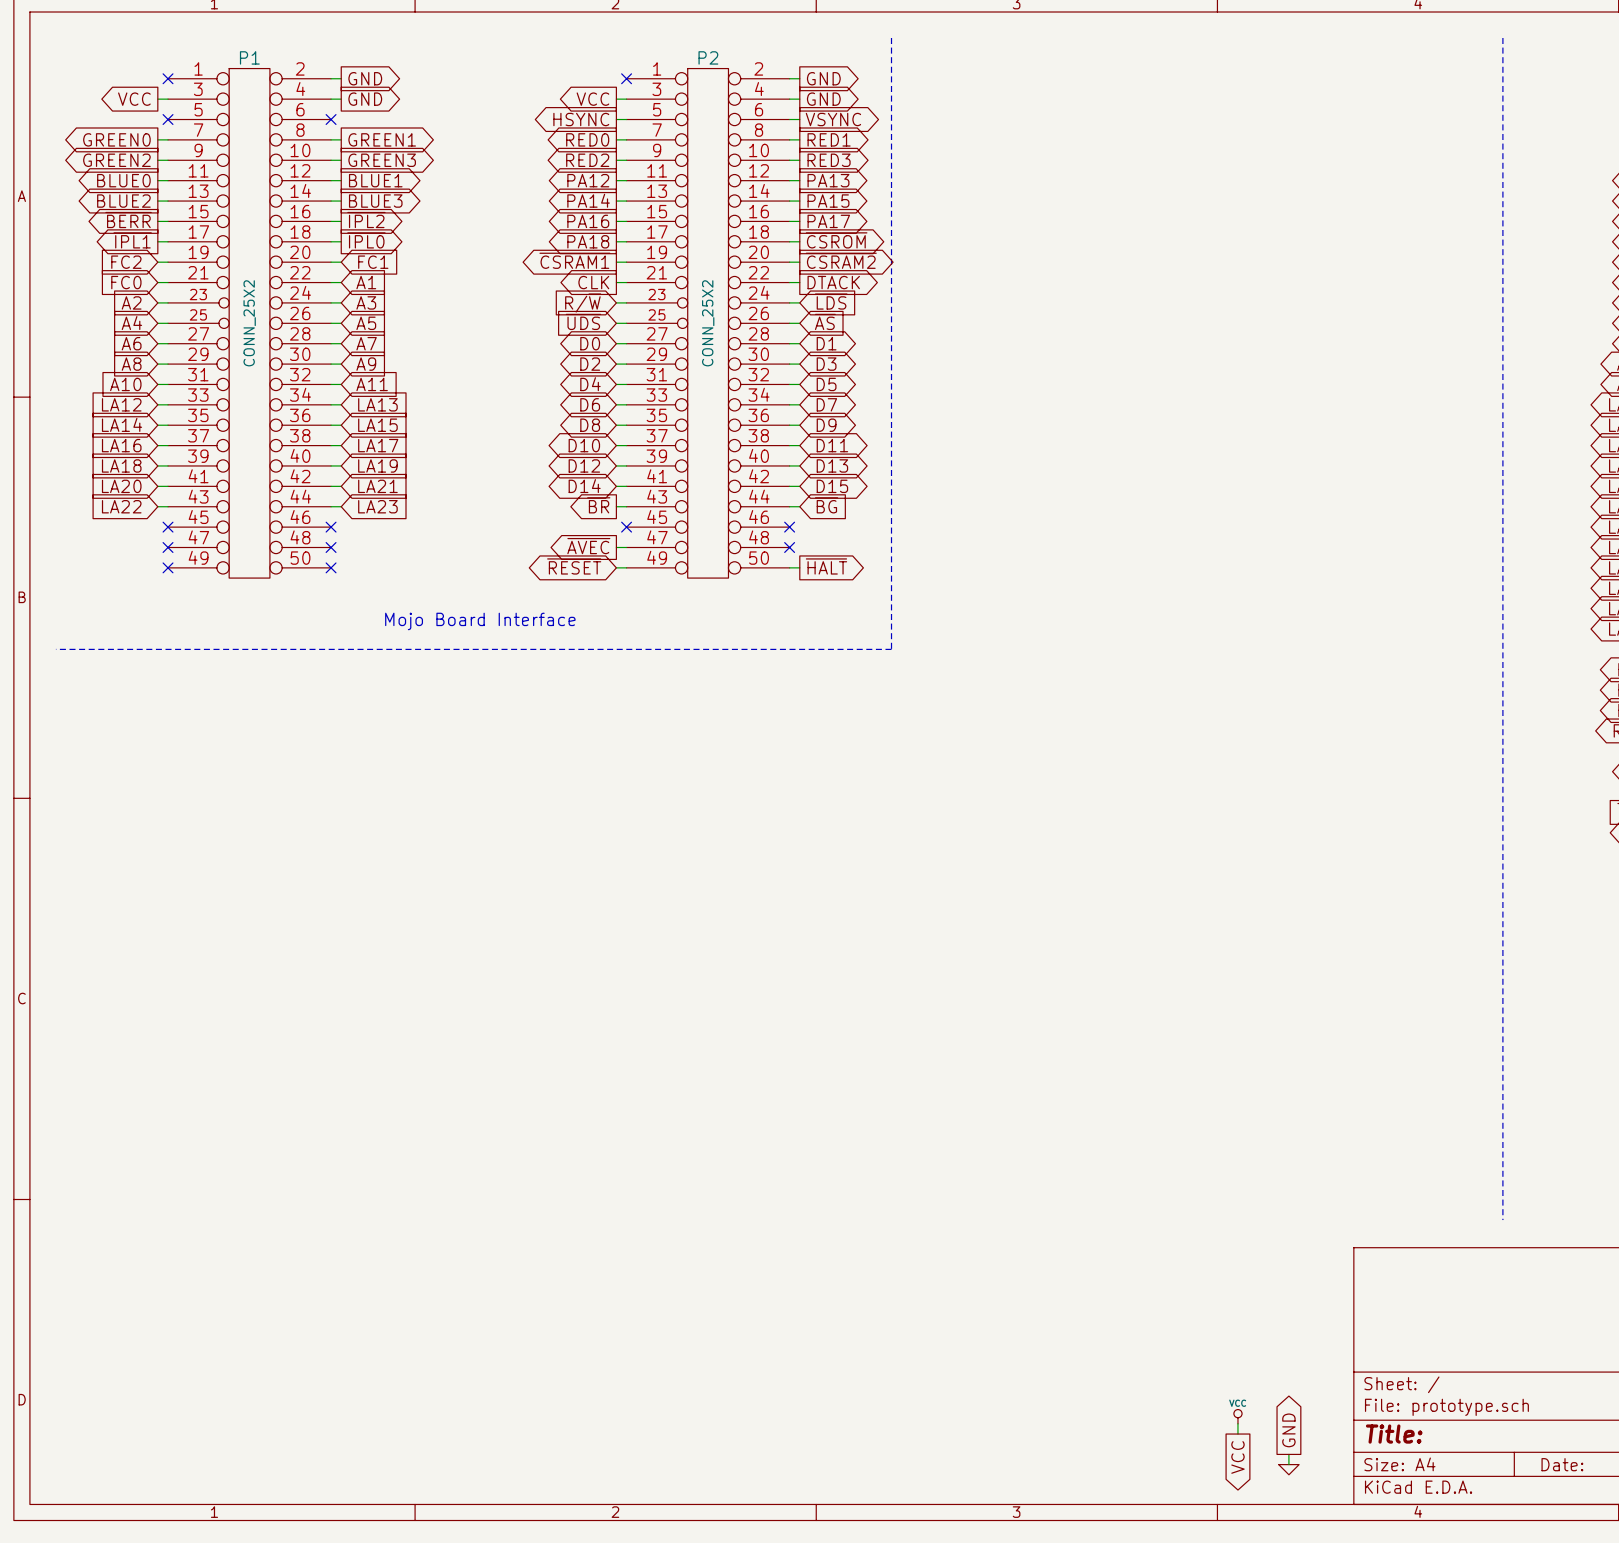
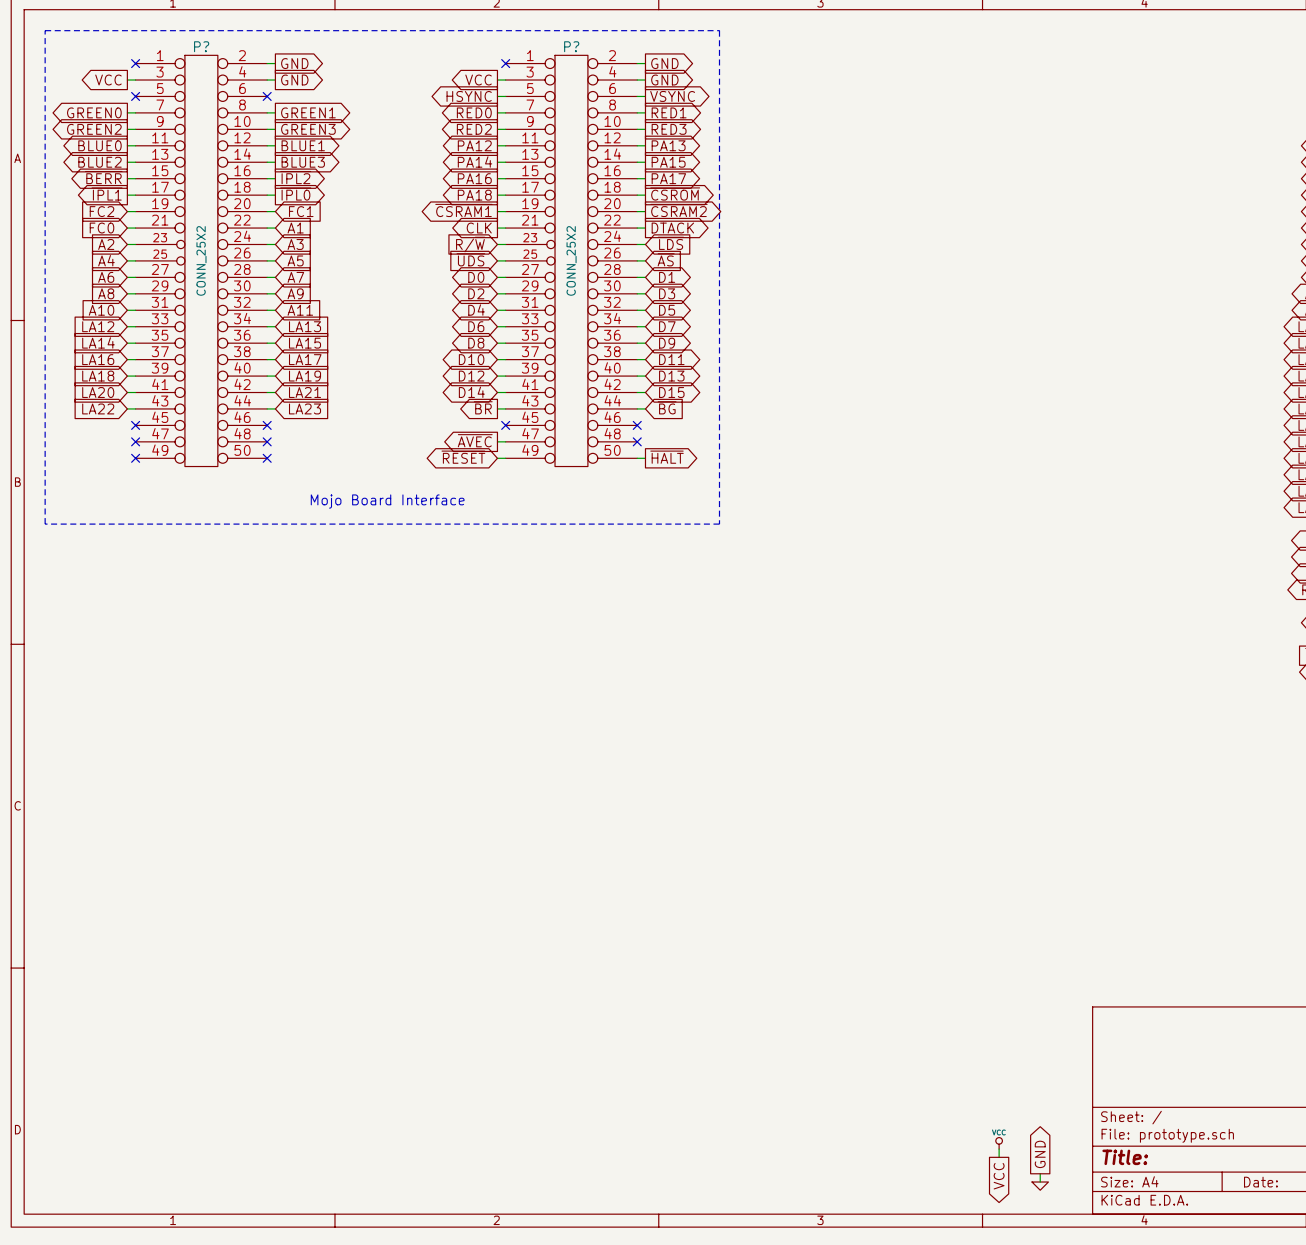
line: none -> (719, 30) (45, 30) (45, 524)
line: (1502, 37) (1502, 1220) -> none
P1 name: P1 (249, 57) -> P? (201, 46)
P2 name: P2 (708, 57) -> P? (571, 46)

